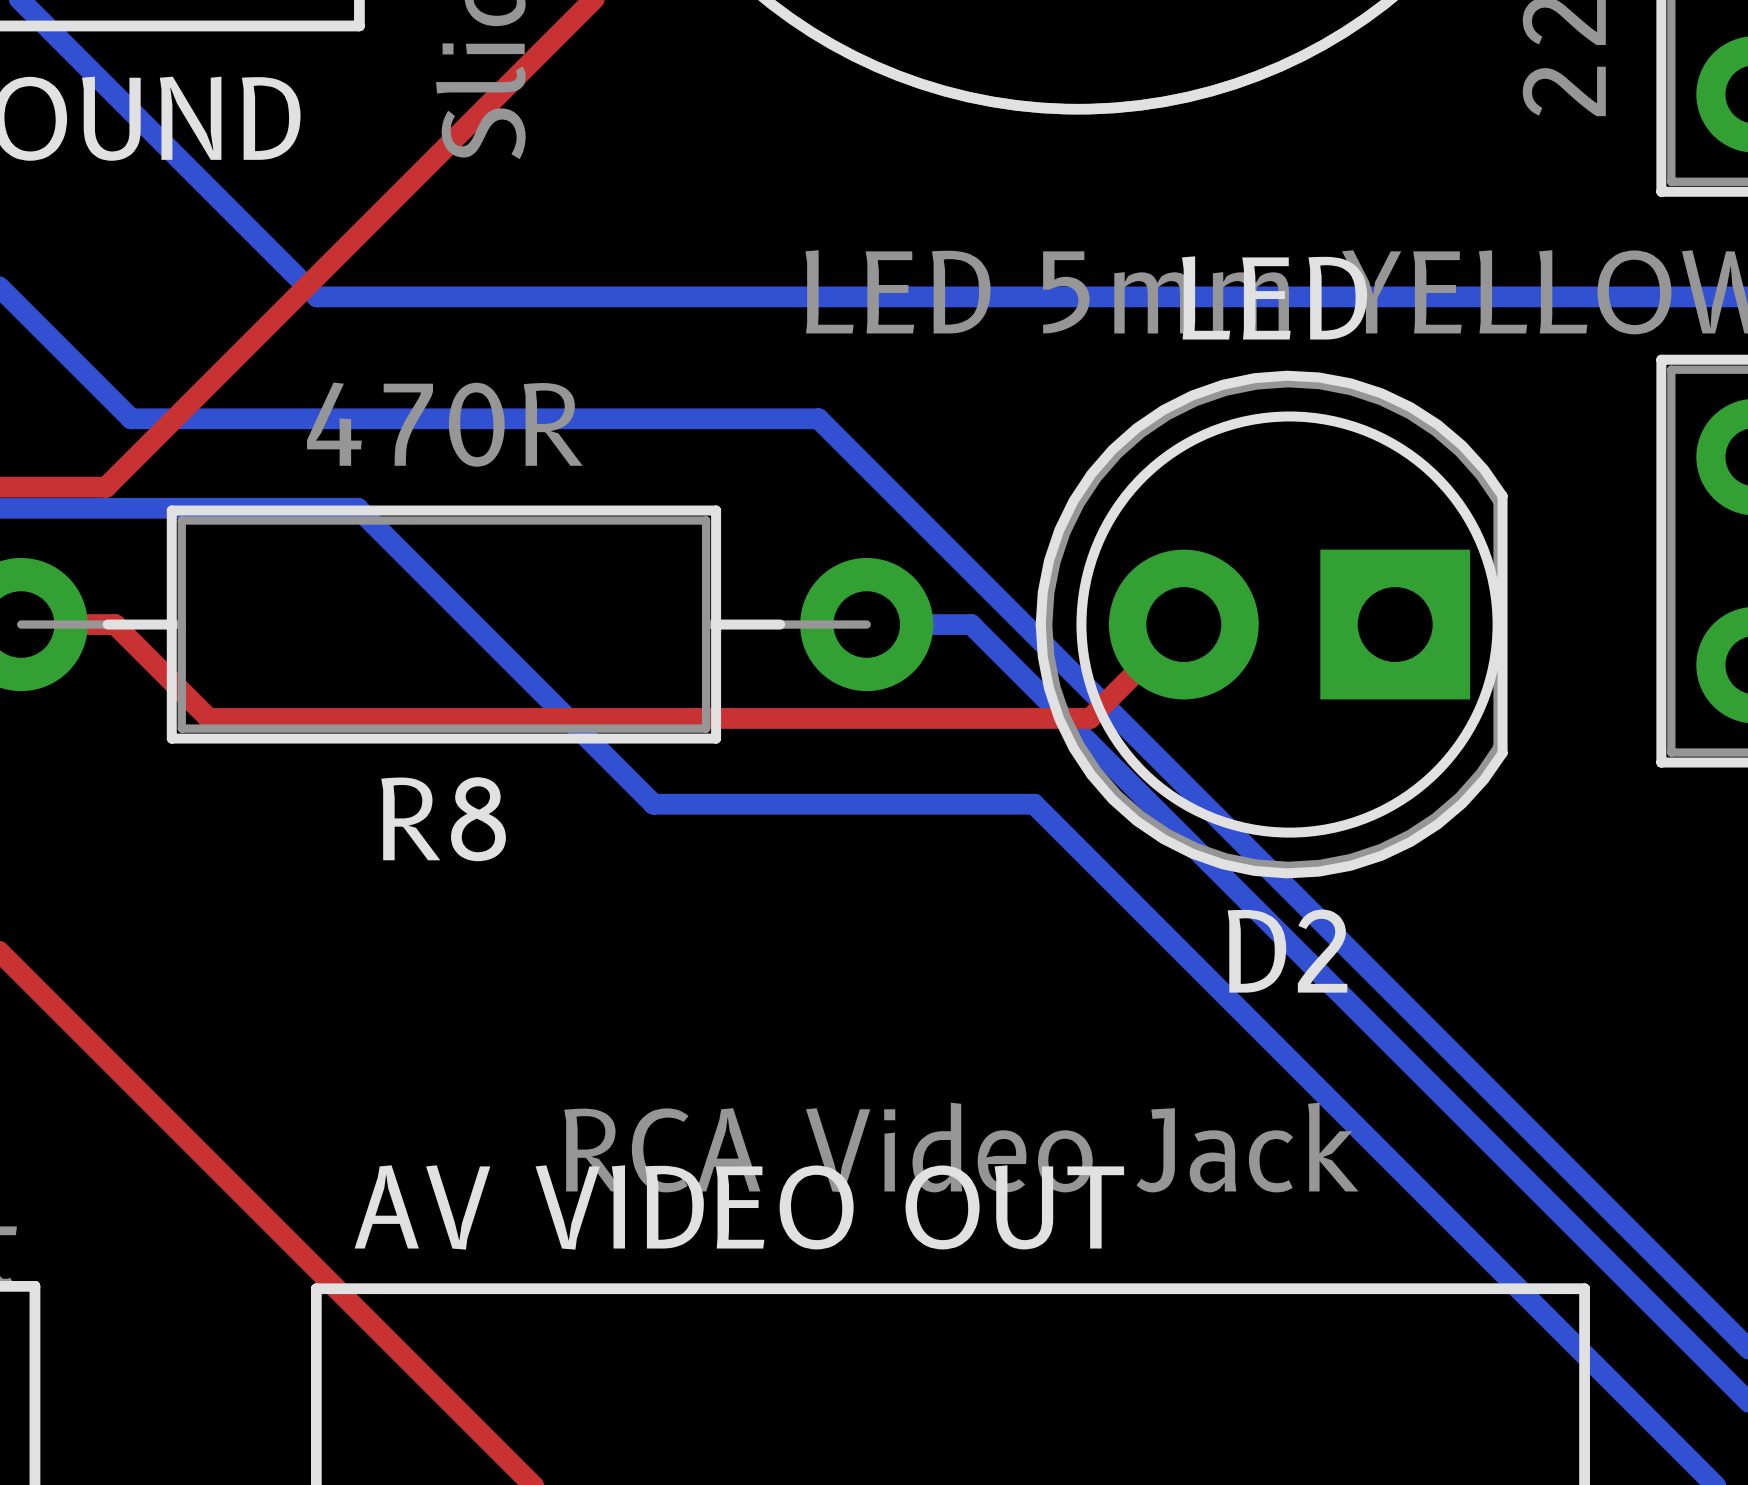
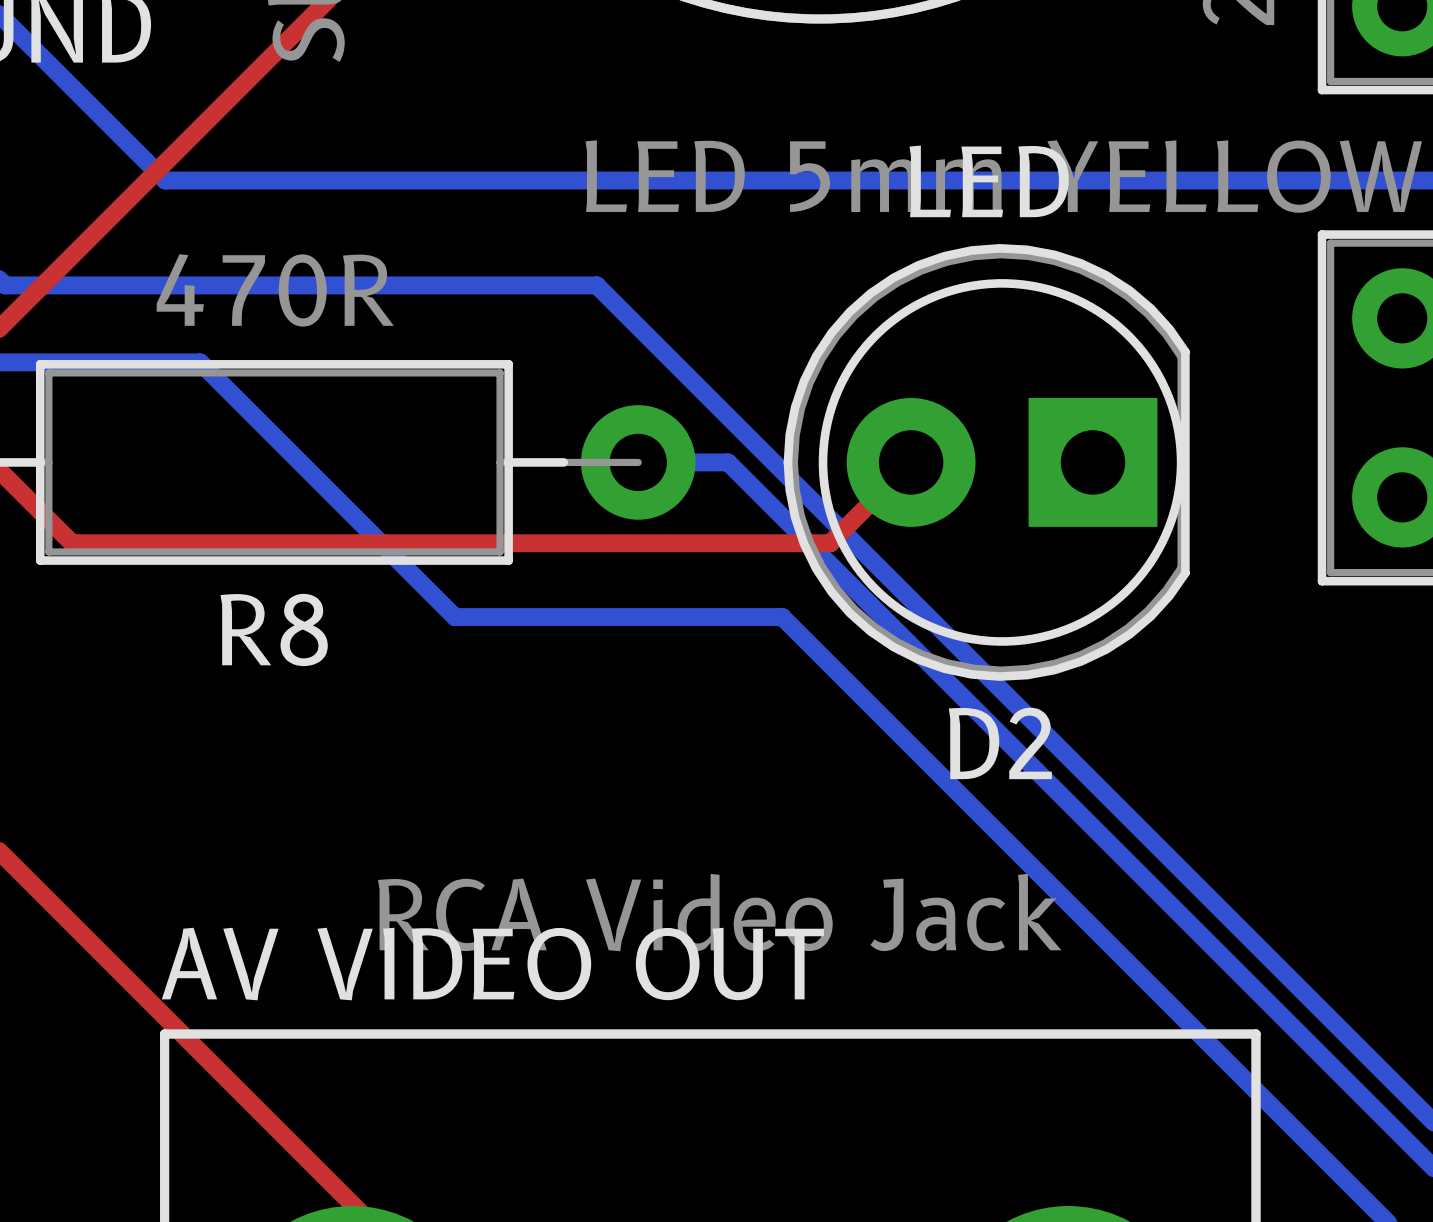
text position: AV VIDEO OUT (739, 1207) -> AV VIDEO OUT (492, 964)

